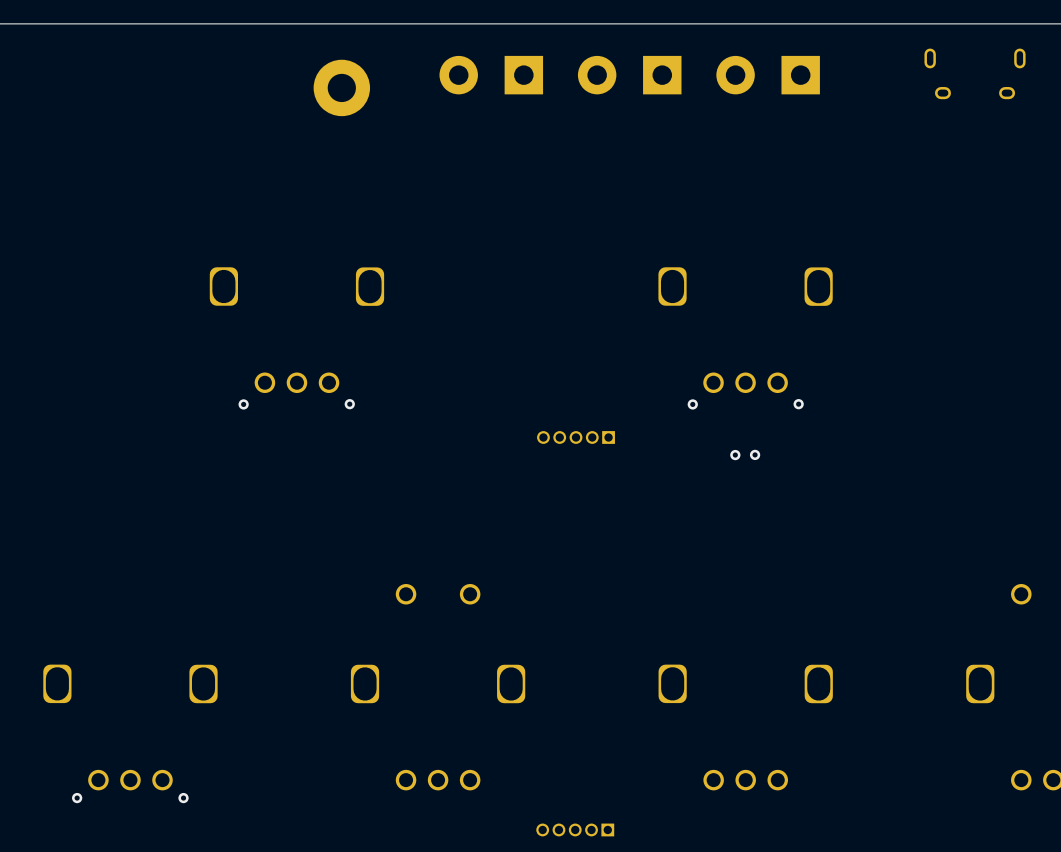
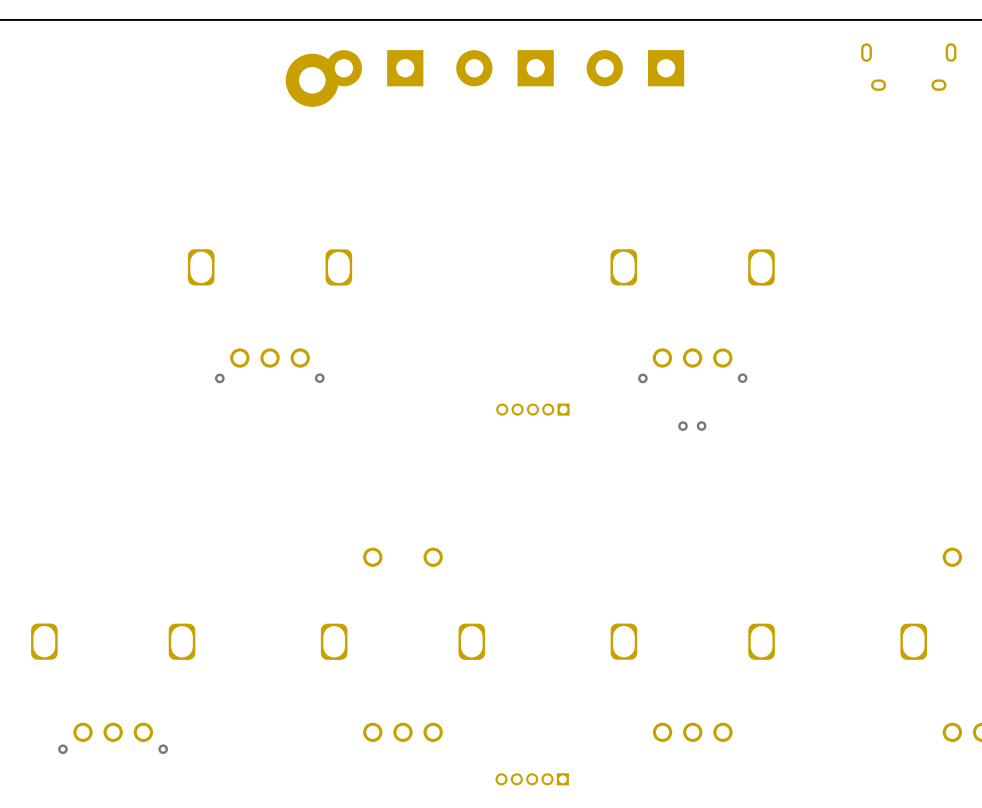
part: none -> (374, 68)
part: (491, 75) -> none
part: none -> (505, 68)
part: (629, 75) -> none
part: none -> (635, 68)
part: (768, 75) -> none

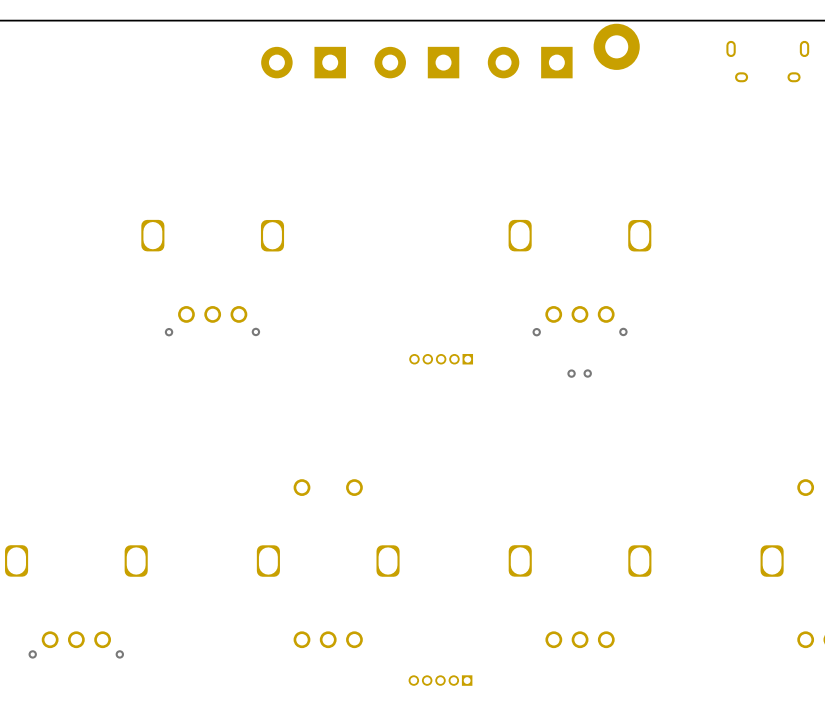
part: none -> (616, 46)
part: (312, 80) -> none

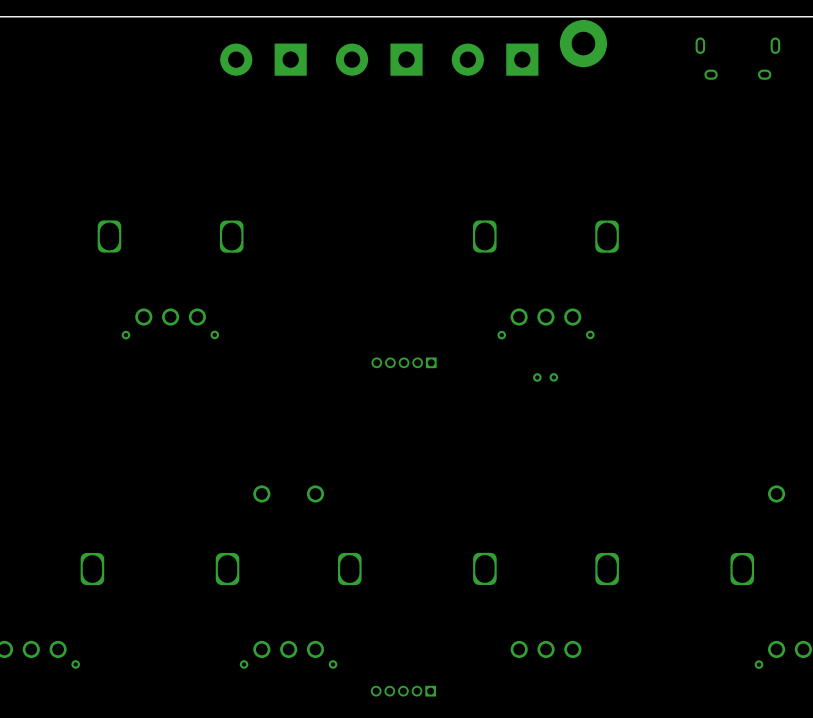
via: none -> (244, 664)
via: none -> (333, 664)
via: none -> (758, 664)

